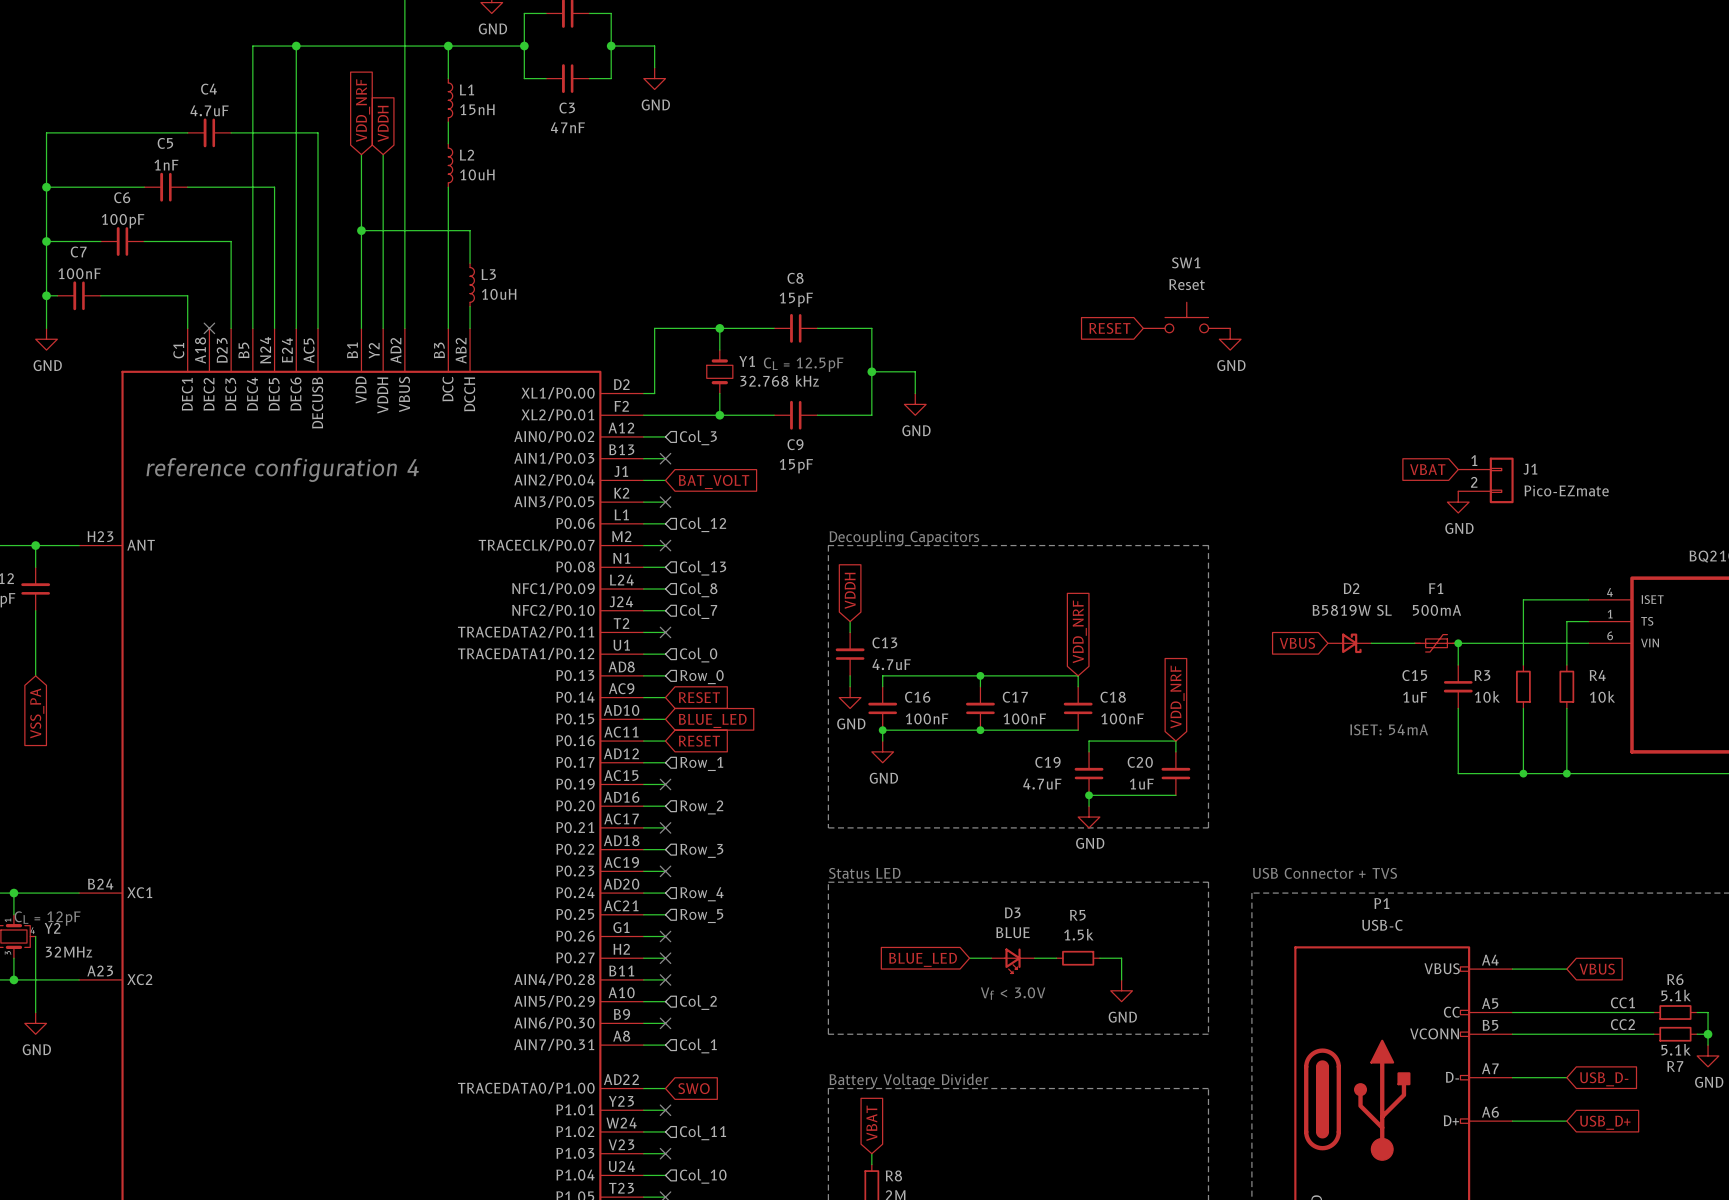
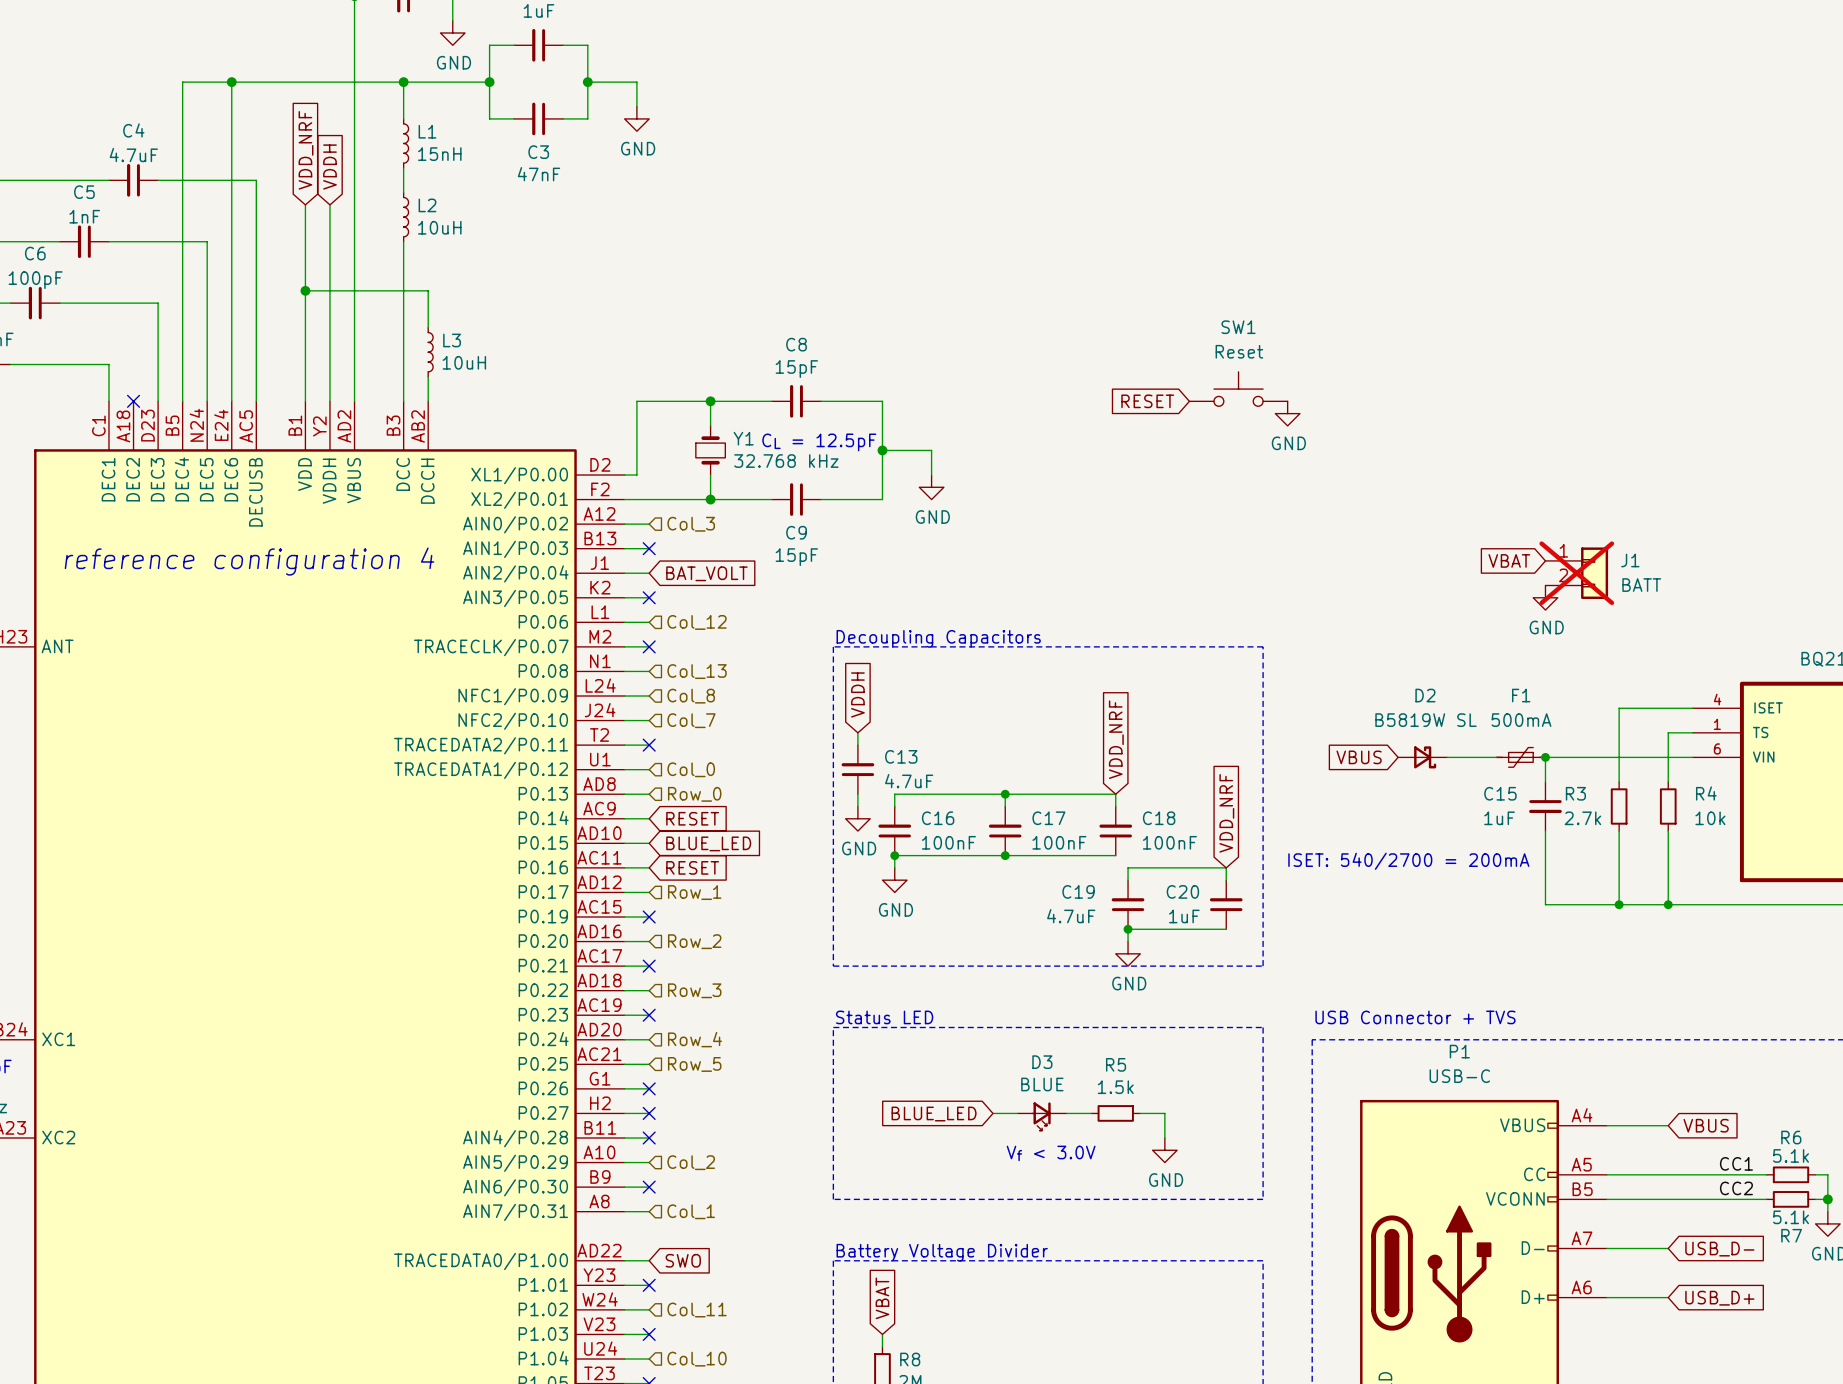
J1 do-not-place cross: none -> (1576, 573)
J1 value: Pico-EZmate (1566, 490) -> BATT (1641, 585)
R3 value: 10k (1487, 696) -> 2.7k (1582, 818)
text: ISET: 54mA (1389, 729) -> ISET: 540/2700 = 200mA (1408, 861)

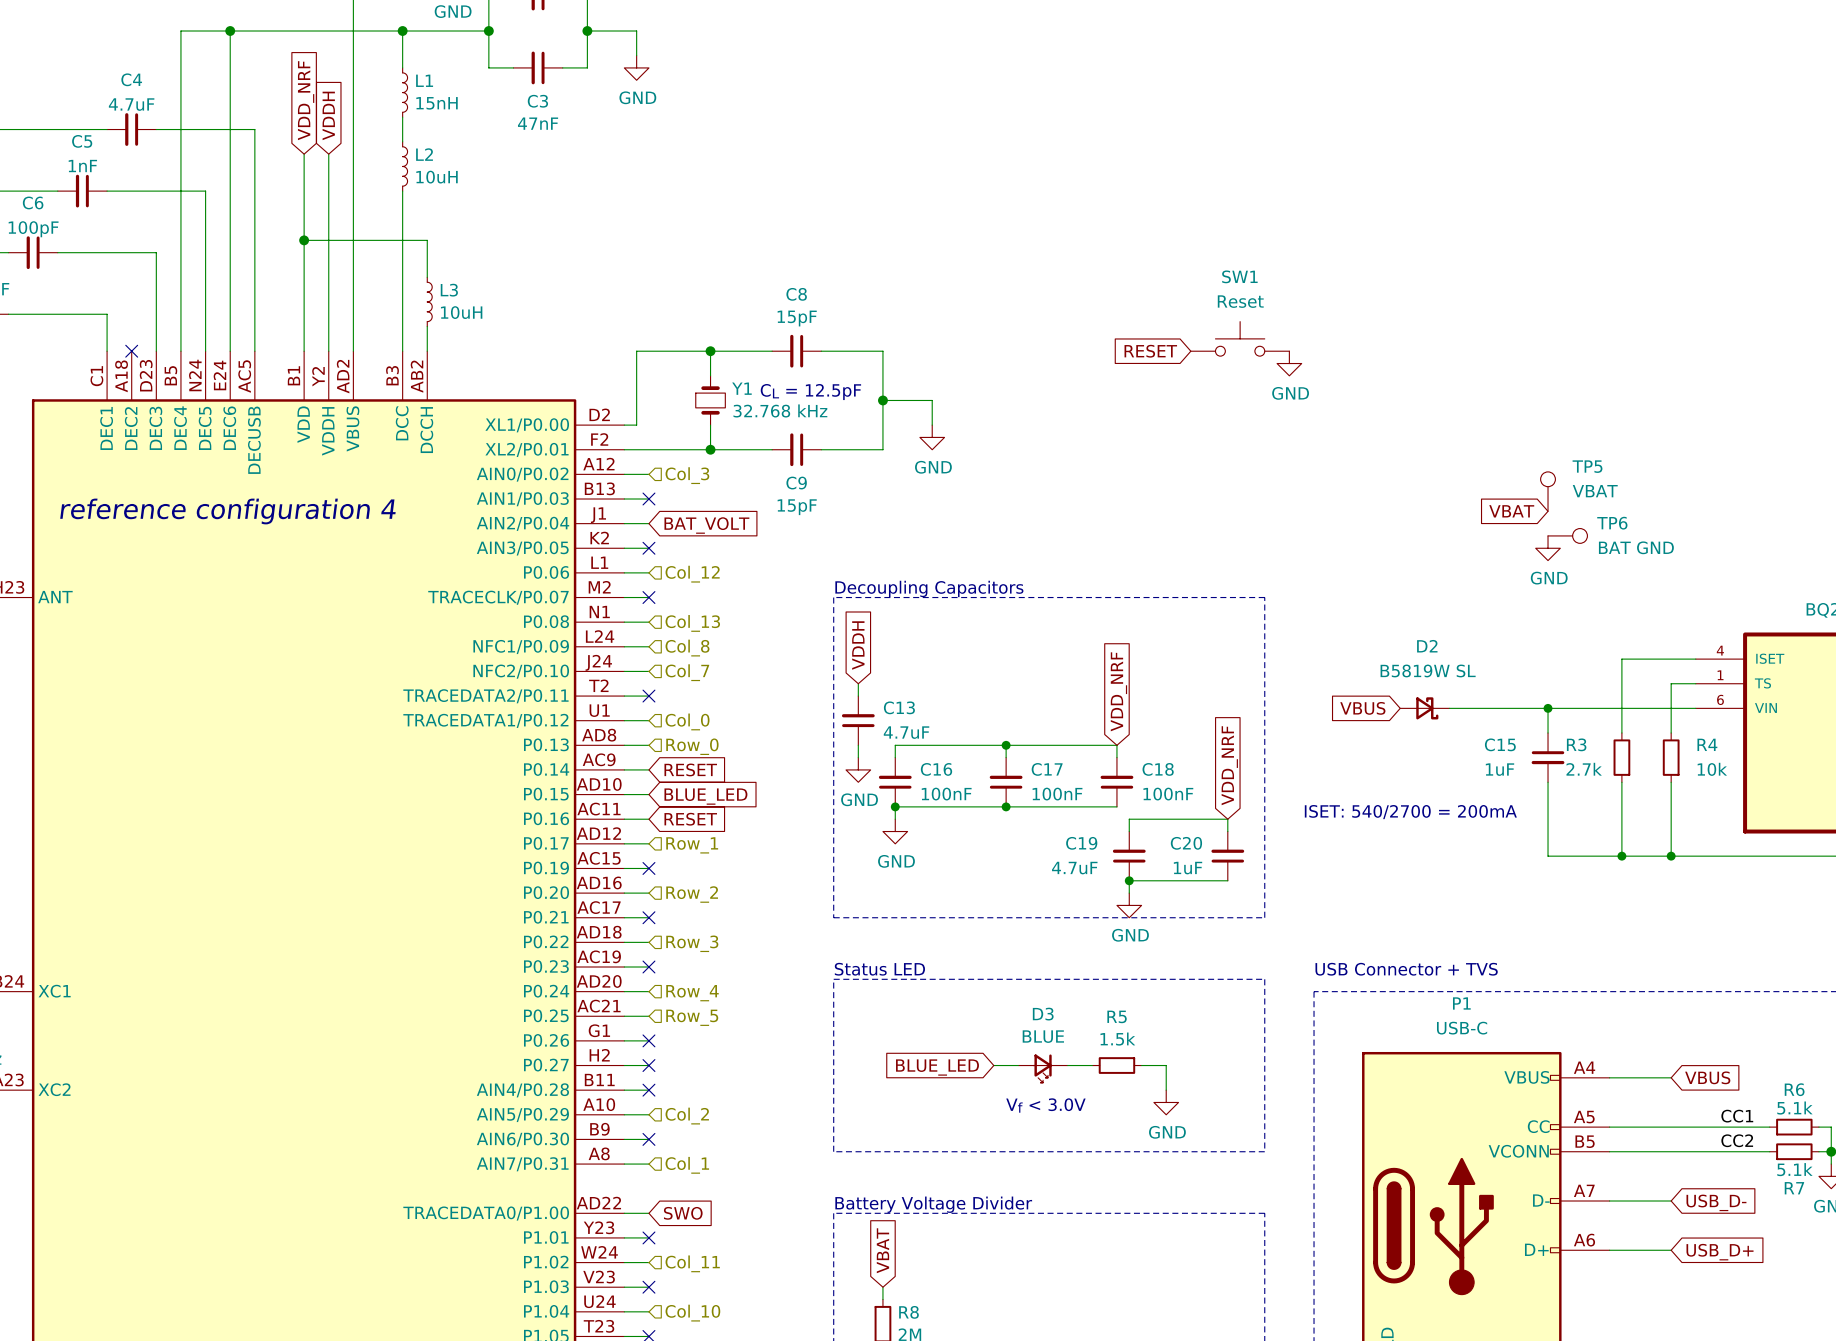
TP5: none -> VBAT (1548, 491)
J1: BATT (1576, 573) -> none
TP6: none -> BAT GND (1567, 535)
F1: 500mA (1520, 757) -> none

